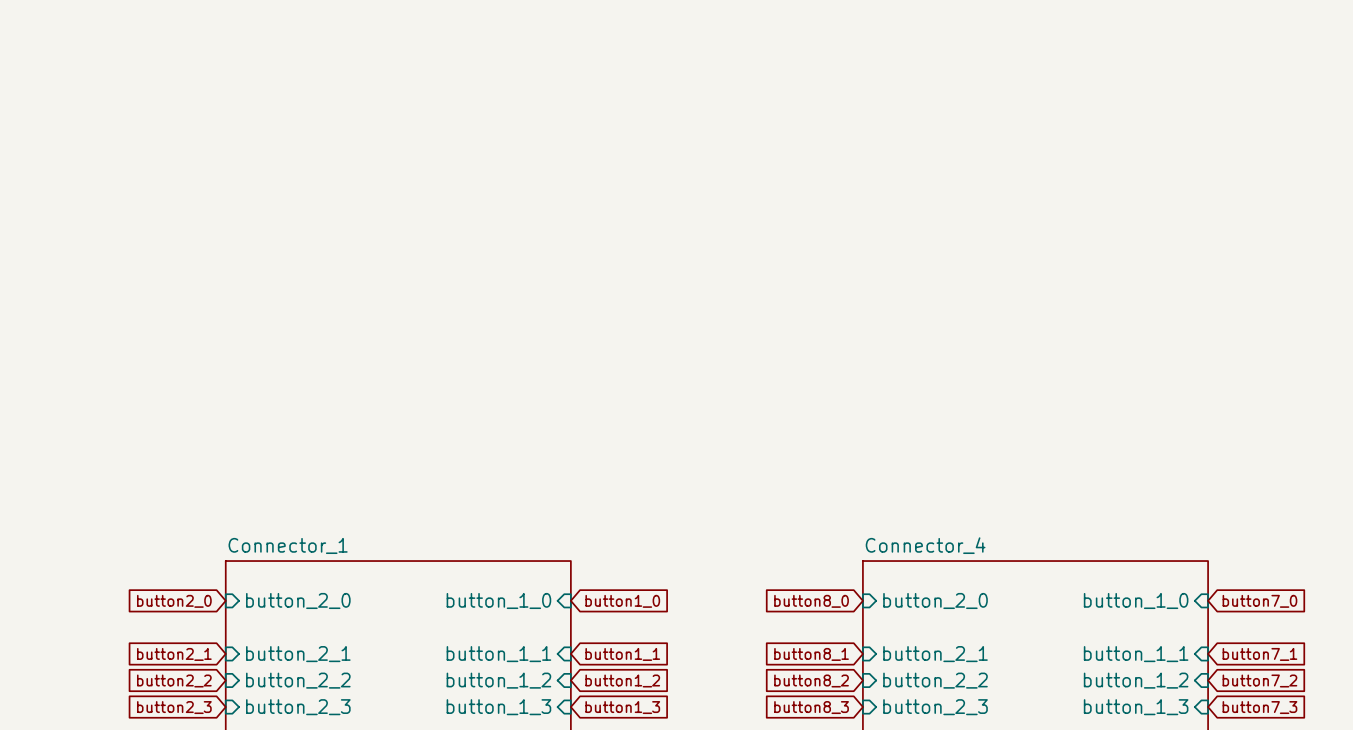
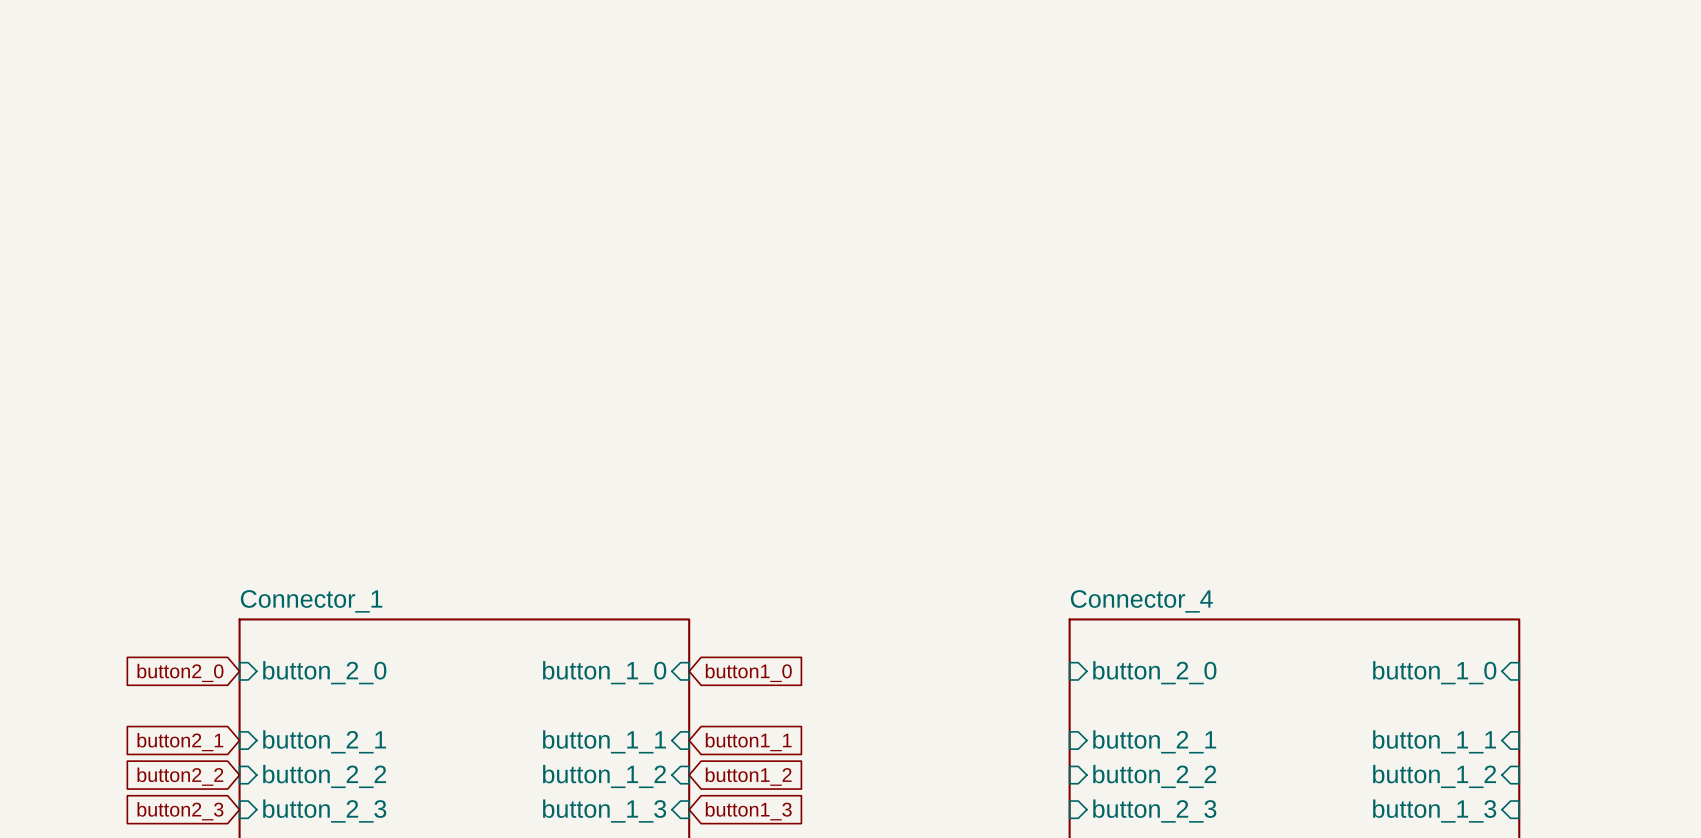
global label: button8_0 (811, 601) -> none
global label: button7_0 (1259, 601) -> none
global label: button8_1 (811, 654) -> none
global label: button7_1 (1259, 654) -> none
global label: button8_2 (811, 680) -> none
global label: button7_2 (1259, 680) -> none
global label: button8_3 (811, 707) -> none
global label: button7_3 (1259, 707) -> none

